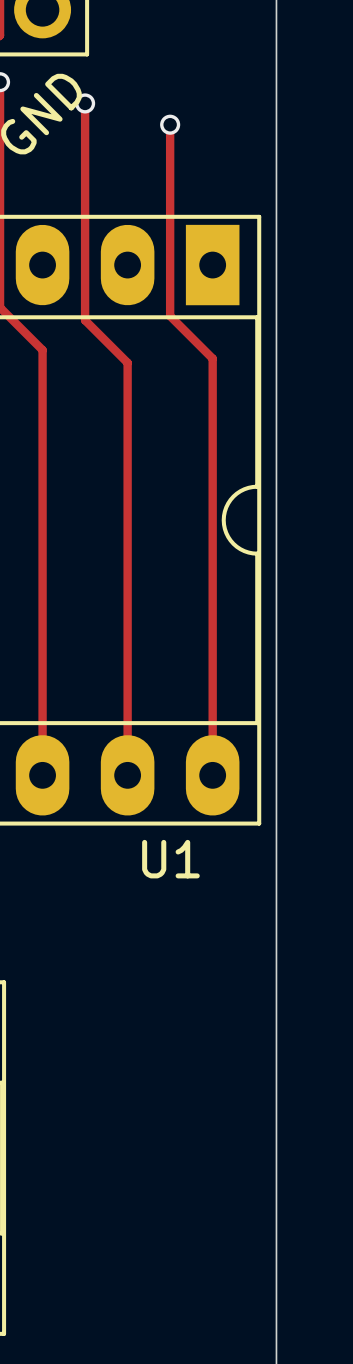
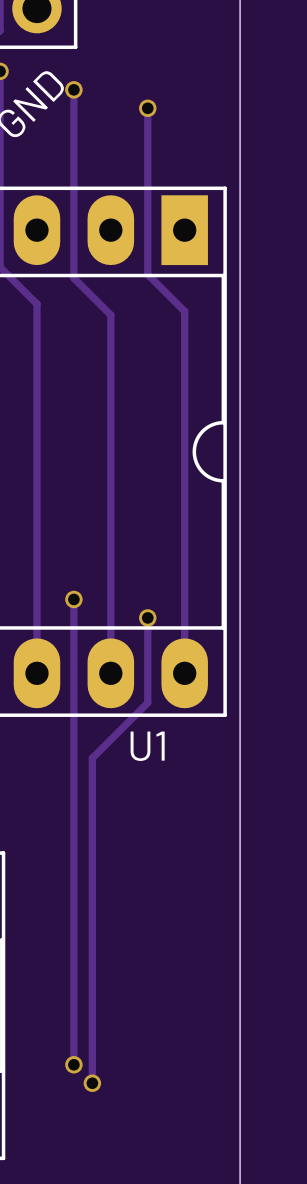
track: none -> (73, 599) (73, 1064)
via: none -> (73, 599)
track: none -> (147, 617) (147, 702) (92, 758) (92, 1083)
via: none -> (147, 617)
via: none -> (73, 1064)
via: none -> (92, 1083)

